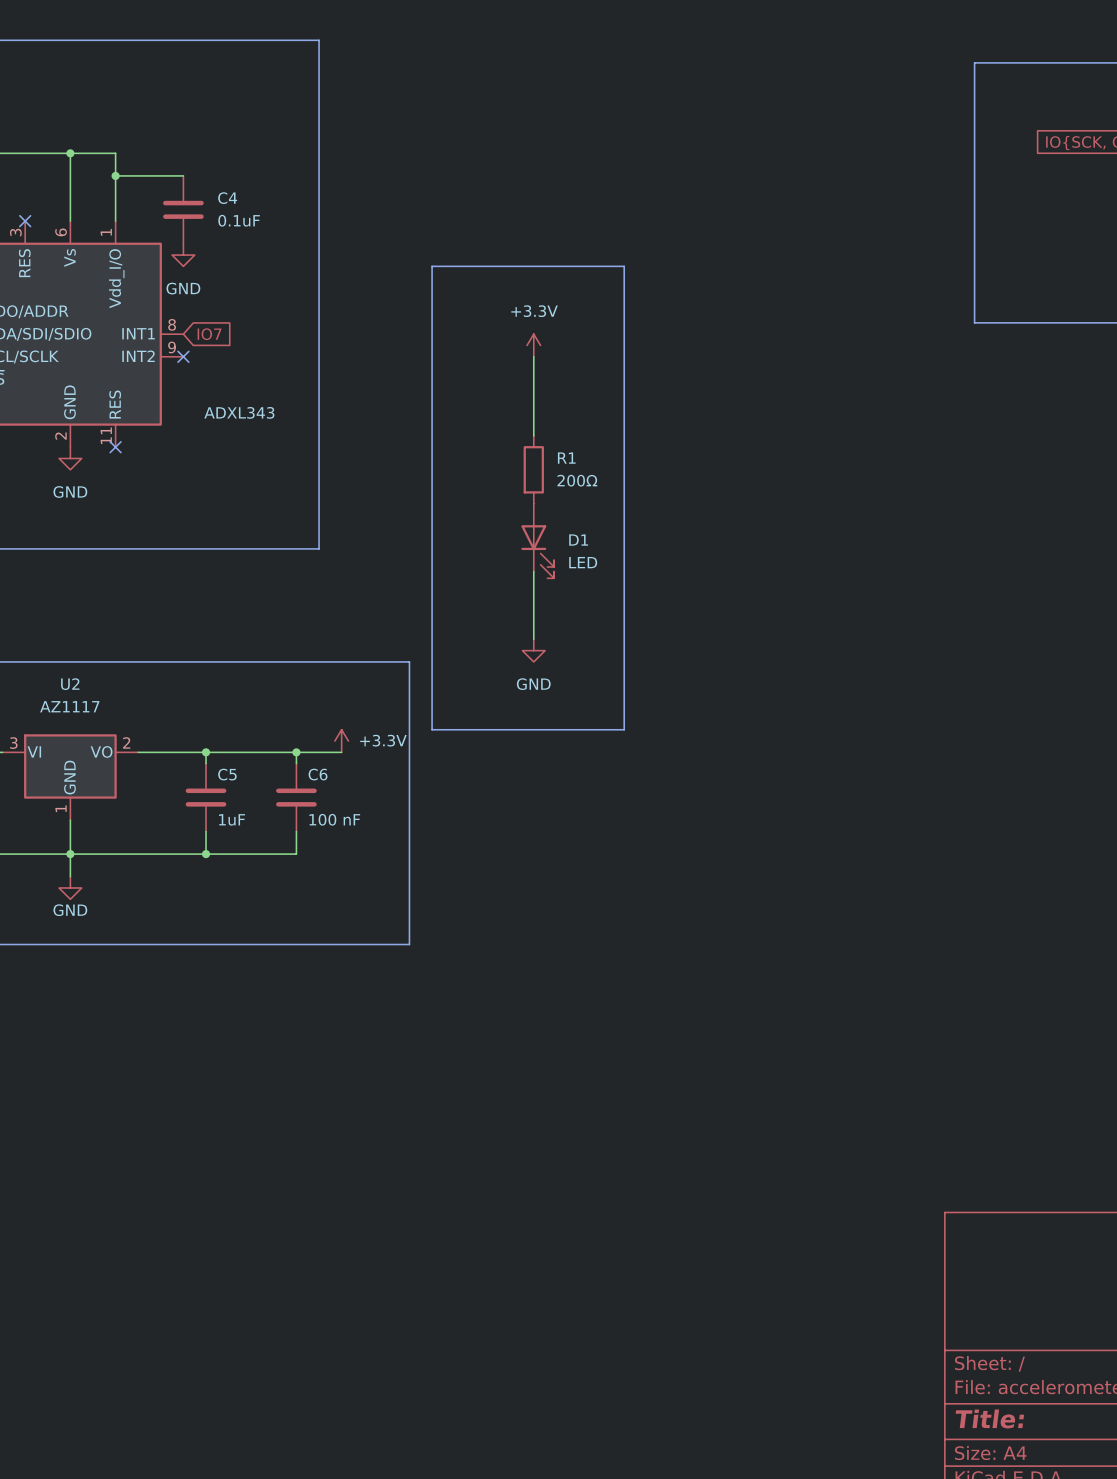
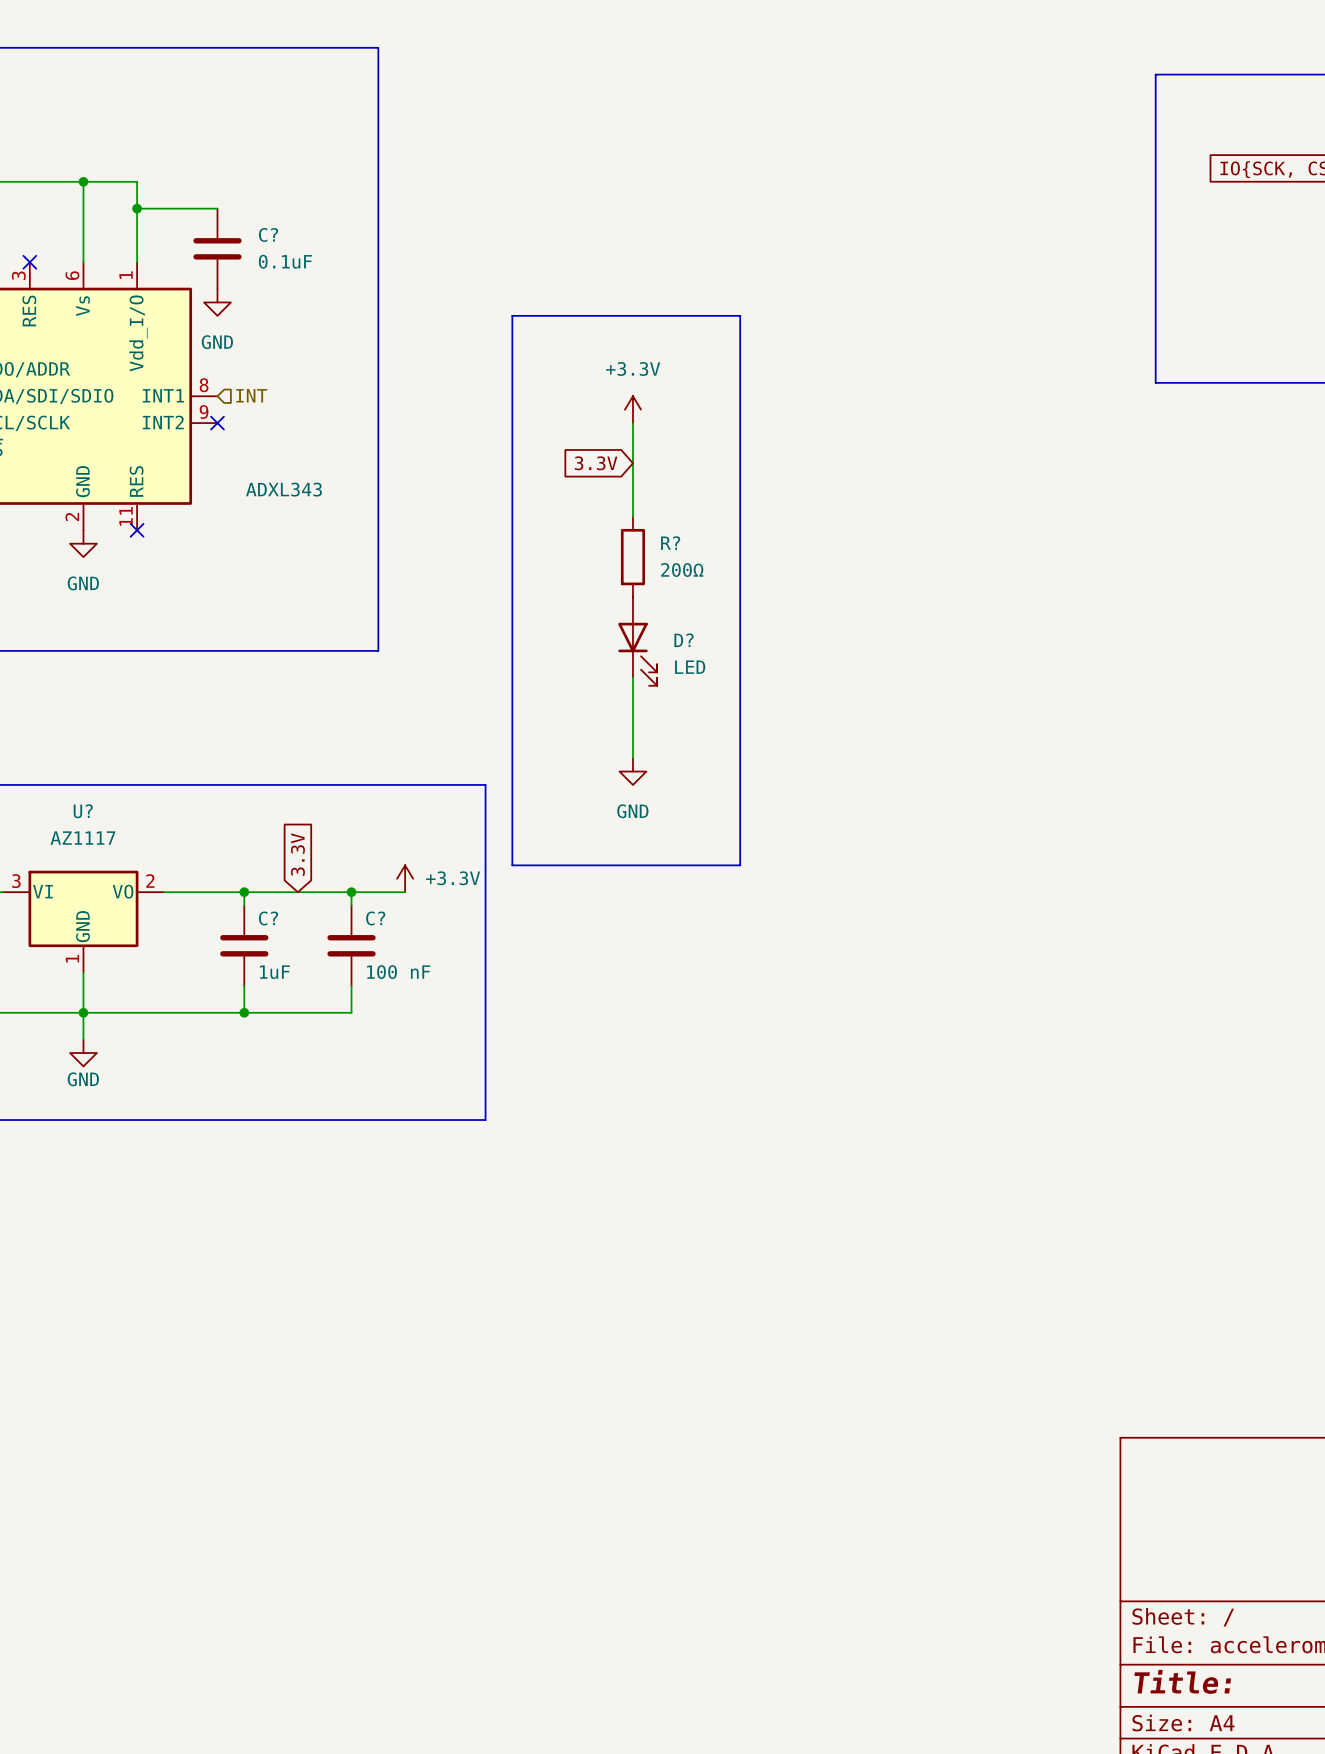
C4 name: C4 (227, 198) -> C? (268, 234)
hierarchical label: none -> INT (251, 395)
global label: IO7 (209, 334) -> none
global label: none -> 3.3V (596, 463)
R1 name: R1 (566, 458) -> R? (670, 543)
D1 name: D1 (578, 540) -> D? (684, 640)
U2 name: U2 (70, 684) -> U? (83, 811)
global label: none -> 3.3V (297, 854)
C5 name: C5 (227, 774) -> C? (268, 918)
C6 name: C6 (318, 774) -> C? (375, 918)

